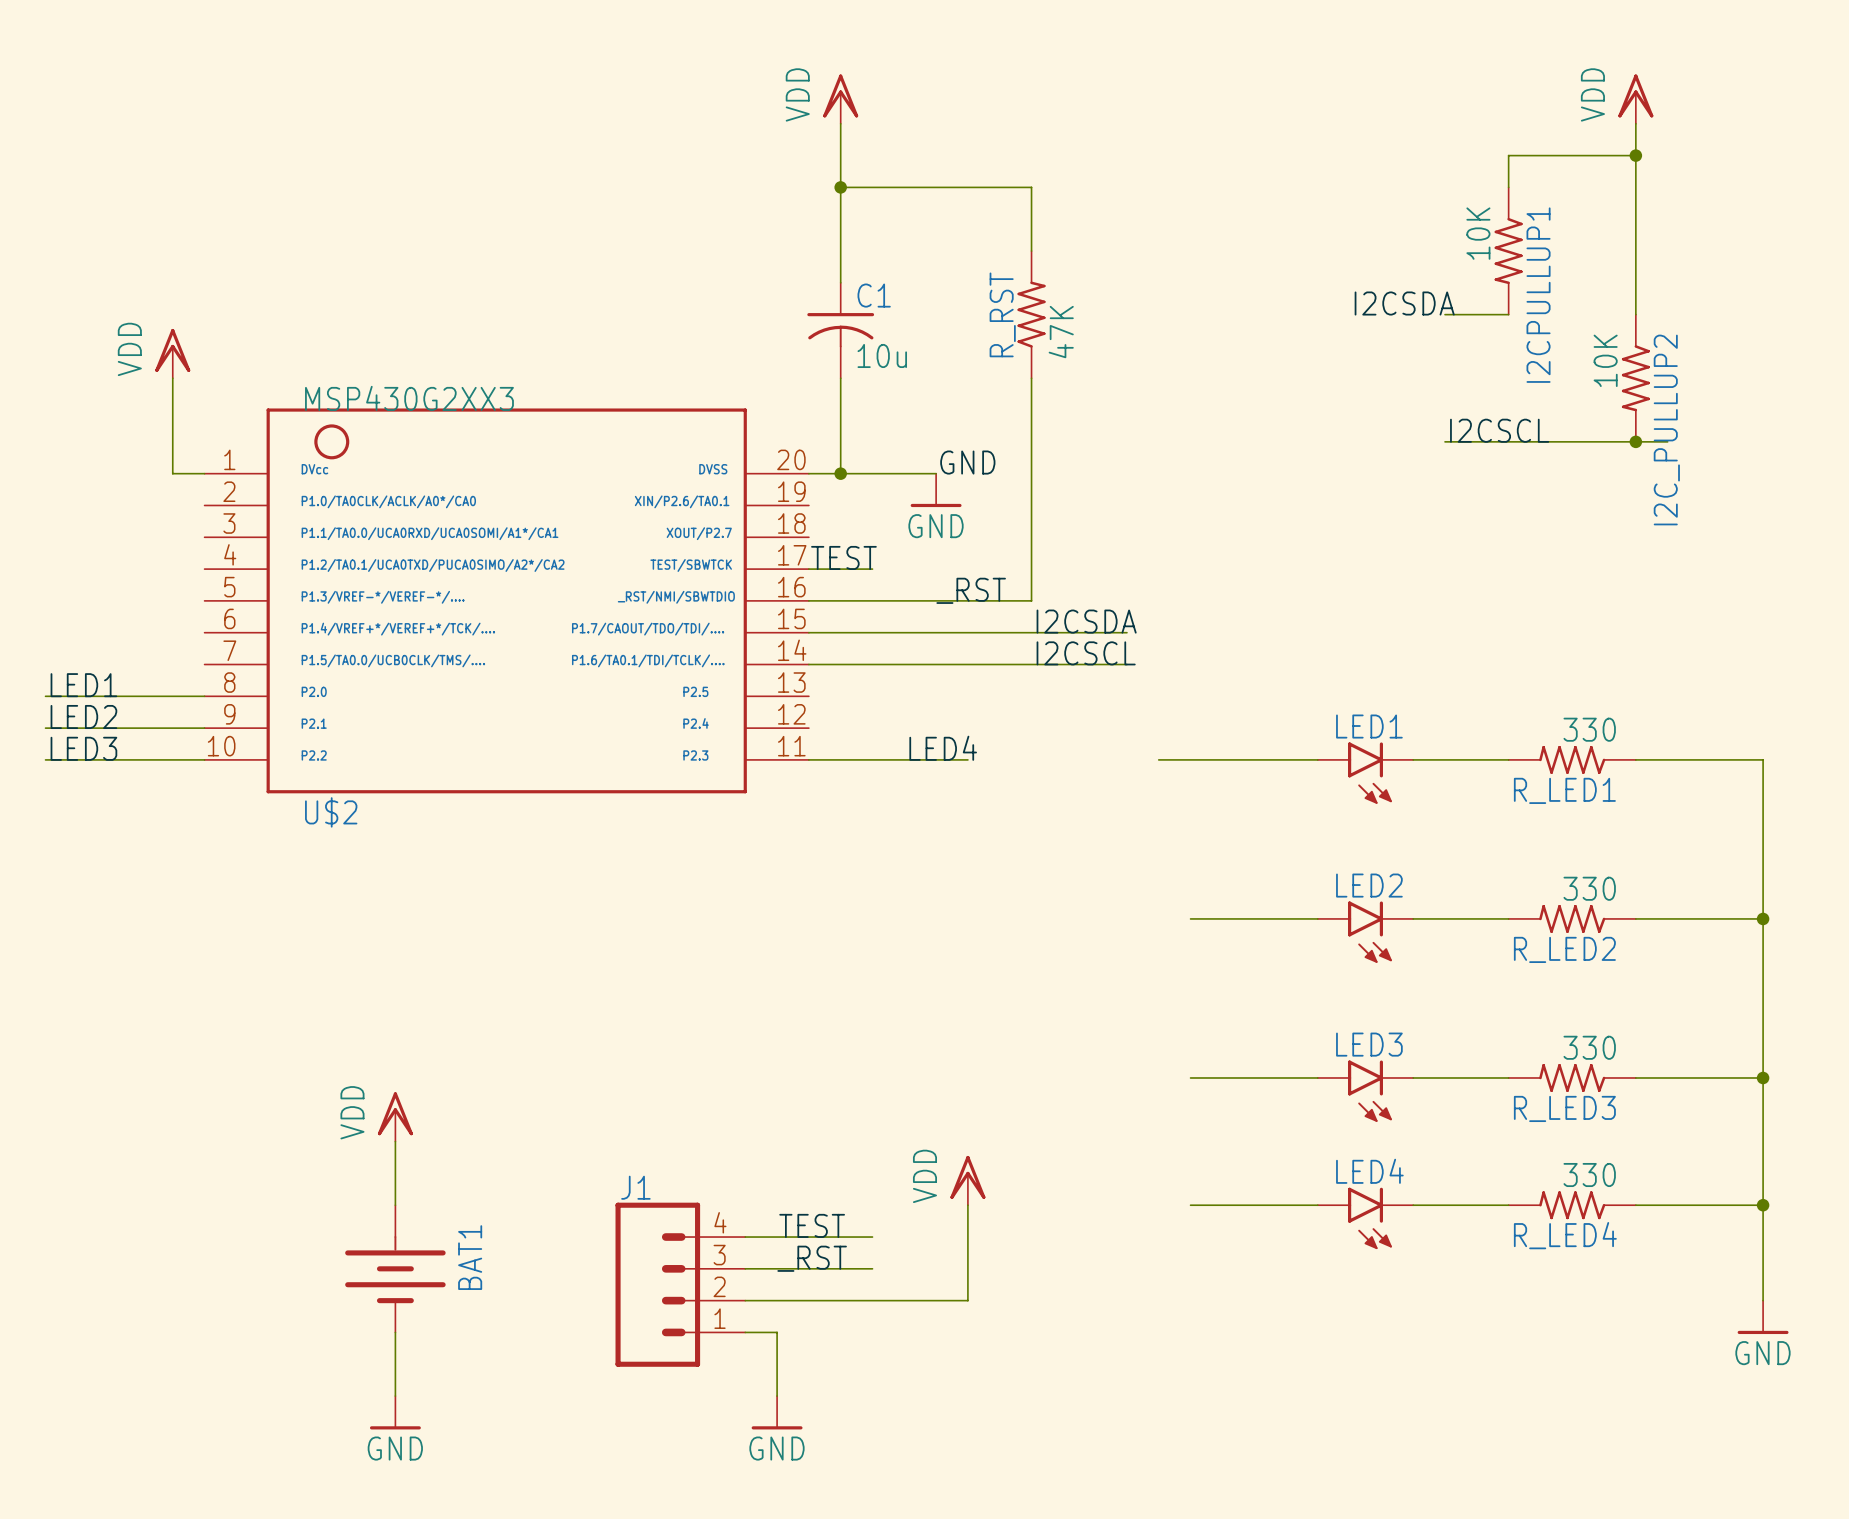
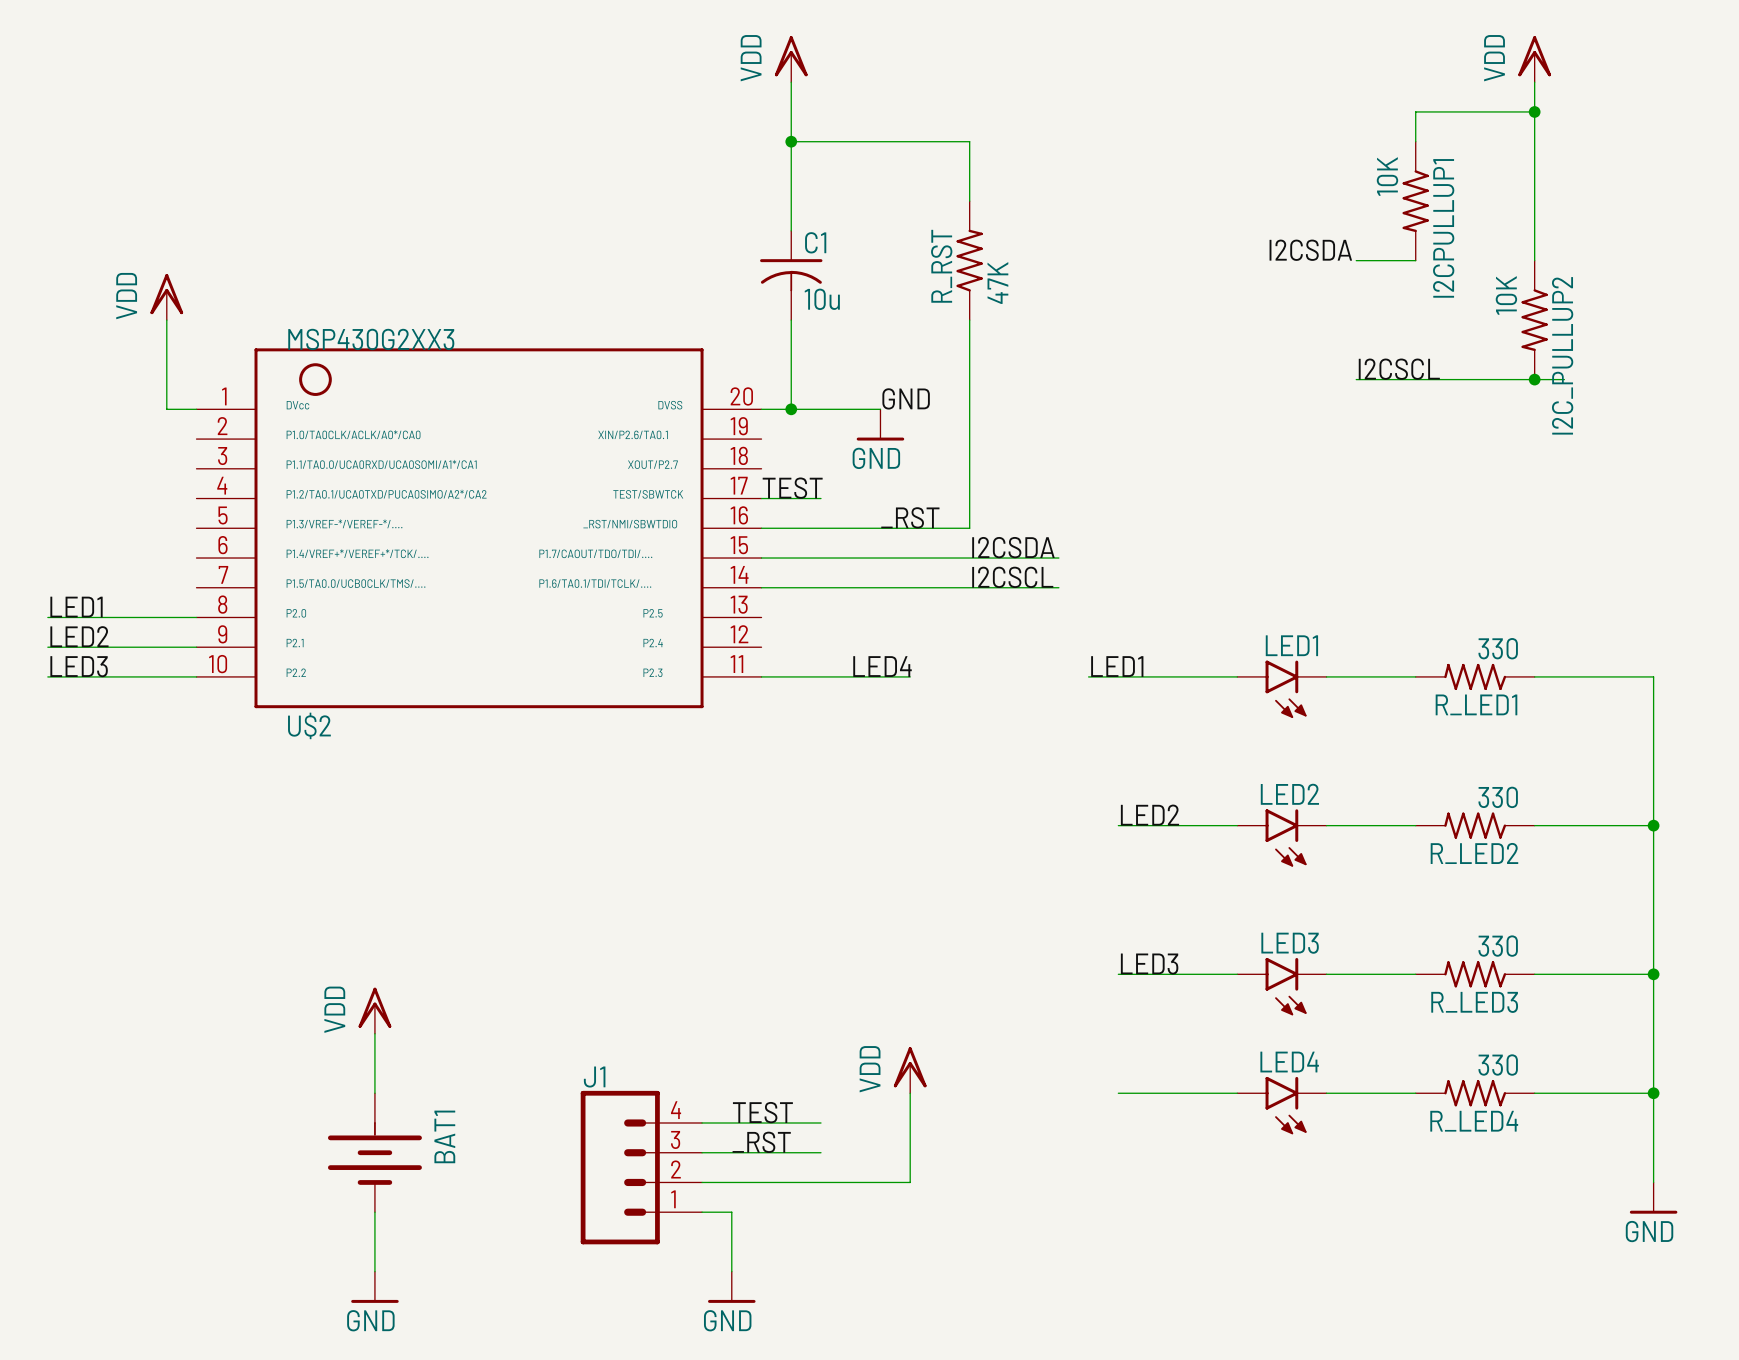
label: none -> LED1 (1117, 666)
label: none -> LED2 (1149, 815)
label: none -> LED3 (1149, 964)

